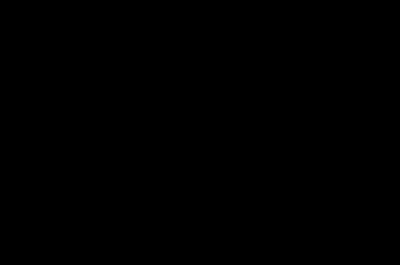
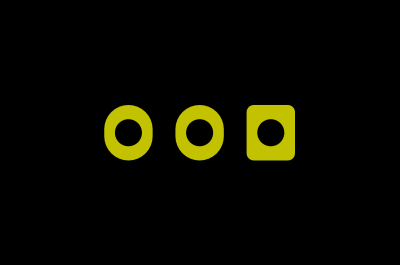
part: none -> (199, 132)

